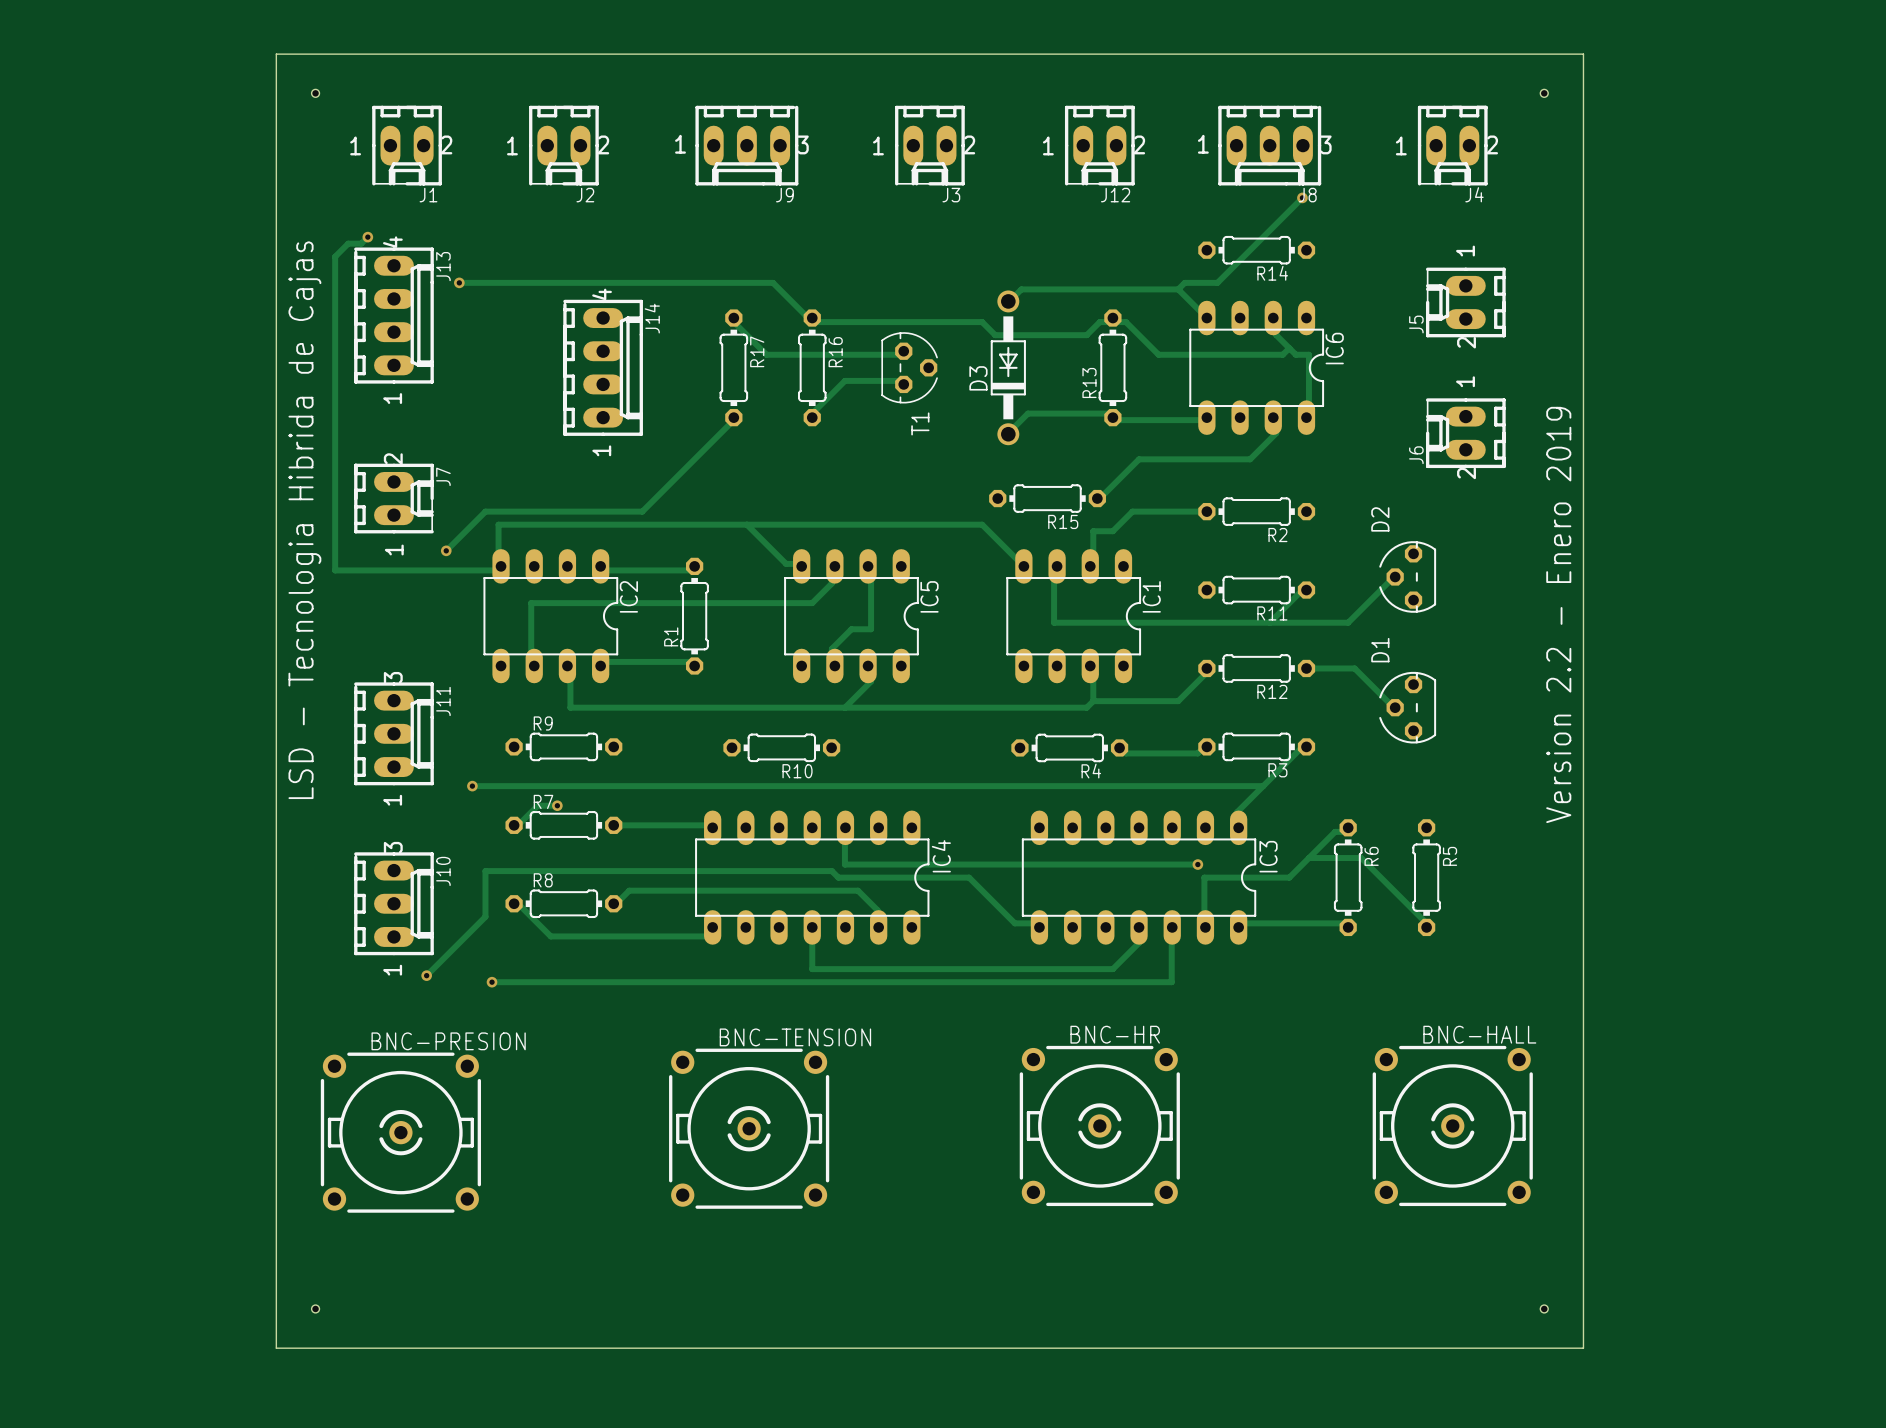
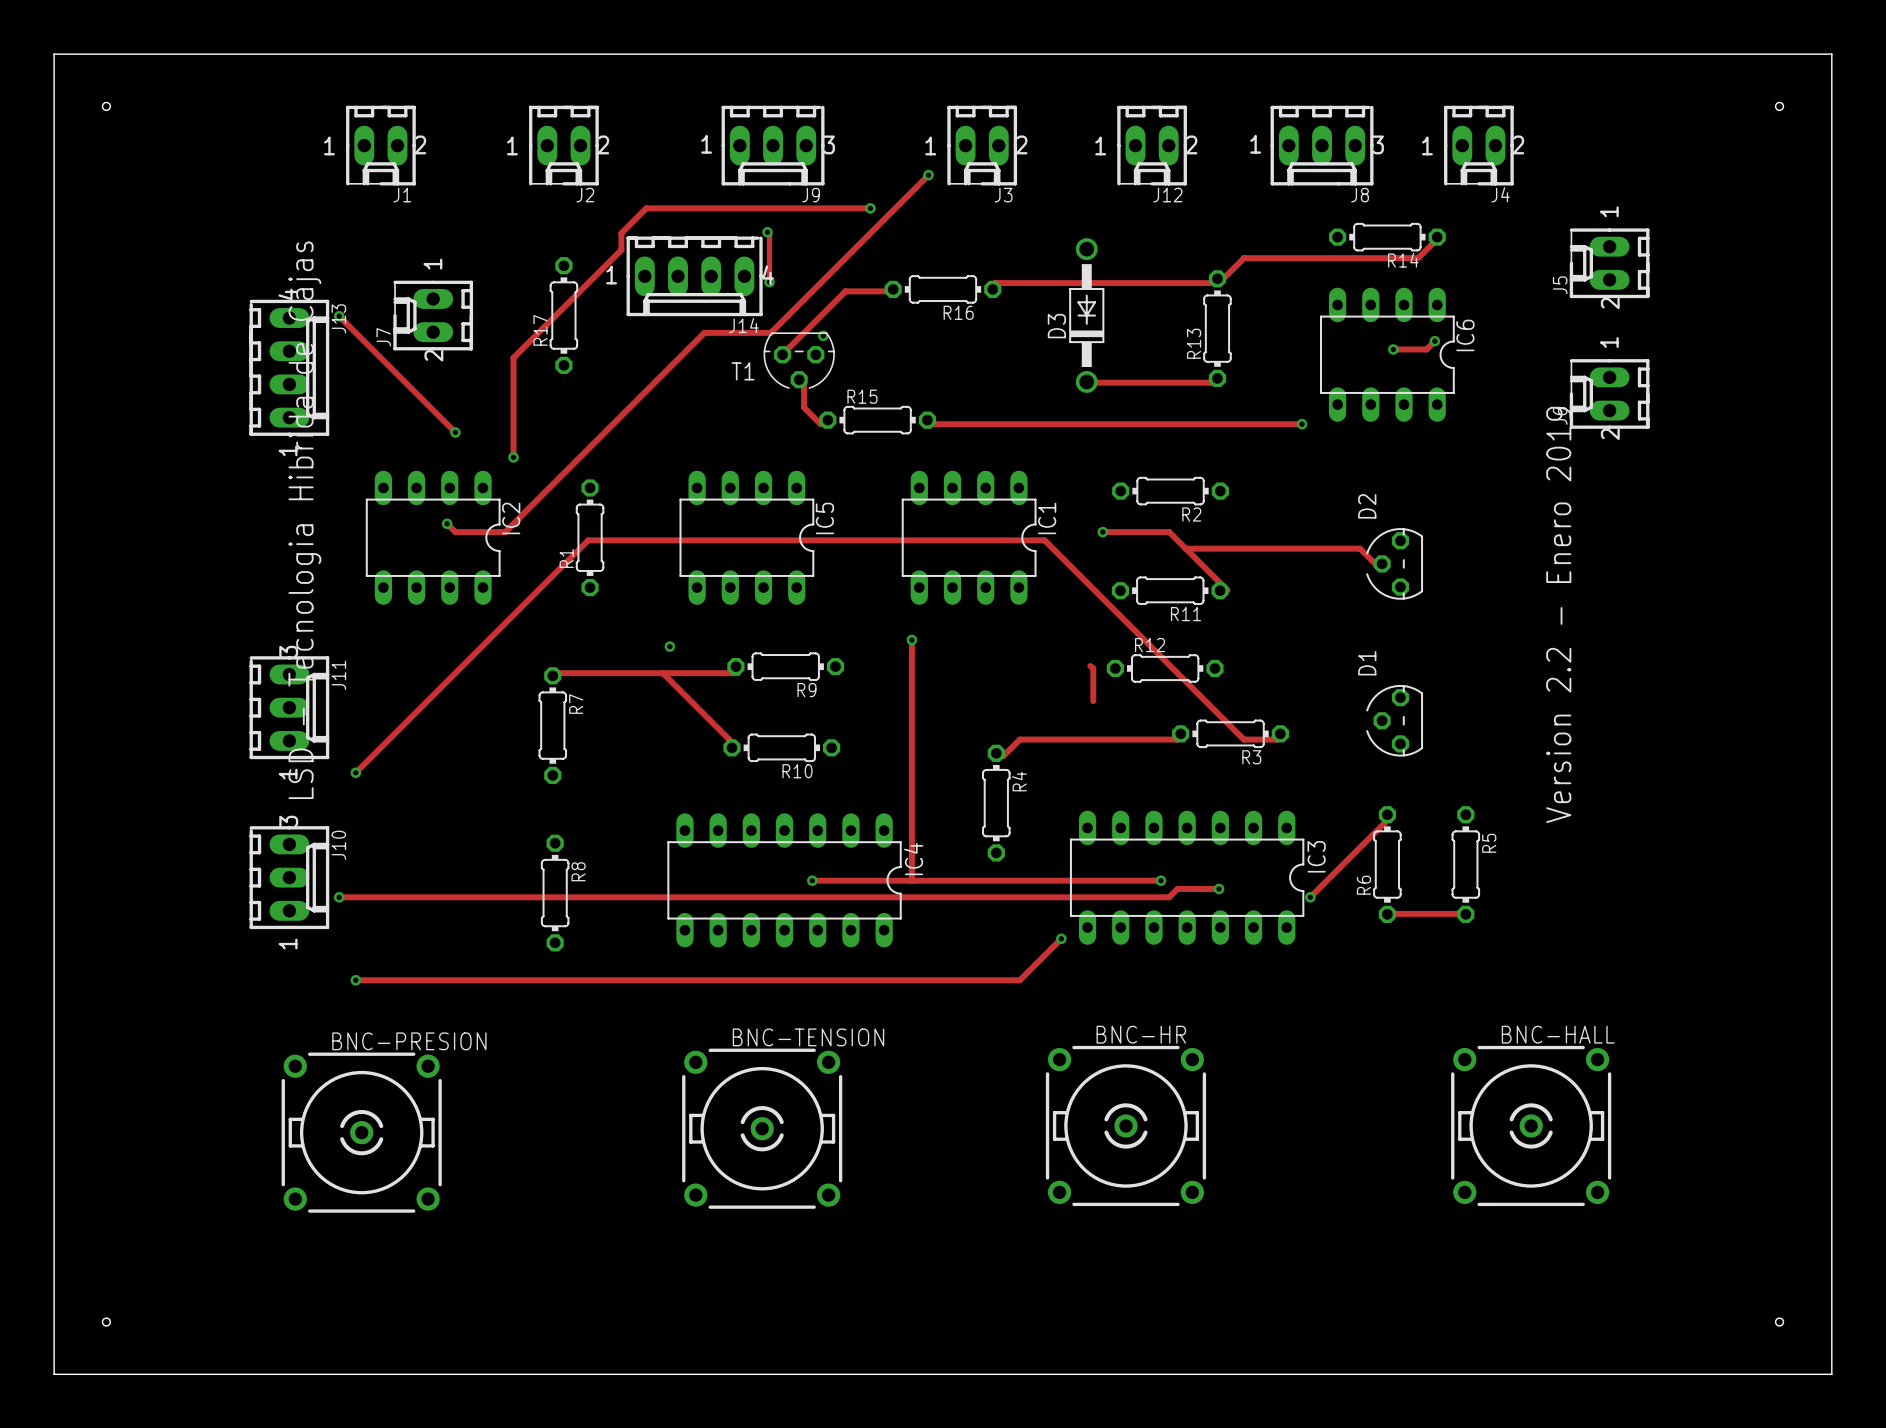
board edge: (276, 54) (276, 1348) (1583, 1348) (1583, 54) -> (276, 54) (54, 54) (54, 1374) (1831, 1374) (1831, 54) (1583, 54)
hole position: (315, 93) -> (106, 106)
hole position: (1544, 93) -> (1779, 106)
J1 position: (407, 145) -> (380, 145)
J9 position: (746, 145) -> (773, 145)
J3 position: (929, 145) -> (982, 145)
J12 position: (1099, 145) -> (1152, 145)
J8 position: (1269, 145) -> (1322, 145)
J4 position: (1452, 145) -> (1478, 145)
track: none -> (928, 175) (770, 332) (704, 332) (505, 532) (455, 532) (447, 523)
via: none -> (928, 175)
track: (1302, 197) (1217, 282) (1184, 282) (1178, 289) -> none
via: (1302, 197) -> none
track: none -> (870, 208) (646, 208) (621, 233) (621, 249) (513, 357) (513, 457)
via: none -> (870, 208)
track: none -> (767, 232) (769, 234) (769, 282)
via: none -> (767, 232)
track: (367, 237) (361, 243) (348, 243) (335, 256) (335, 570) (498, 570) (501, 566) (498, 563) (498, 524) (982, 524) (1023, 566) -> none
via: (367, 237) -> none
track: none -> (1437, 237) (1418, 258) (1243, 258) (1219, 283) (1217, 278) (1210, 283) (994, 283) (992, 289)
R14 position: (1256, 250) -> (1387, 237)
track: (459, 282) (773, 282) (805, 315) (812, 315) (812, 322) (982, 322) (995, 335) (1086, 335) (1099, 322) (1125, 322) (1158, 354) (1282, 354) (1289, 348) -> none
via: (459, 282) -> none
via: none -> (769, 282)
track: none -> (893, 289) (887, 291) (845, 291) (782, 354)
track: (1178, 289) (1206, 318) -> none
track: (1178, 289) (1021, 289) (1014, 295) (1008, 295) (1008, 301) -> none
J5 position: (1465, 302) -> (1609, 263)
J13 position: (393, 315) -> (289, 367)
track: none -> (339, 316) (455, 432)
via: none -> (339, 316)
track: (733, 318) (733, 322) (766, 354) (903, 354) (903, 351) -> none
track: (1273, 318) (1276, 322) (1276, 335) (1295, 354) (1308, 354) (1308, 413) (1306, 417) -> none
via: none -> (823, 335)
track: none -> (1434, 341) (1426, 349) (1393, 349)
via: none -> (1434, 341)
via: none -> (1393, 349)
R17 name position: R17 (757, 351) -> R17 (540, 330)
J14 rotation: 0° (603, 367) -> 90° clockwise (694, 276)
J14 position: (603, 367) -> (694, 276)
R17 position: (733, 367) -> (563, 315)
R16 rotation: 0° (812, 367) -> 90° clockwise (942, 289)
R16 position: (812, 367) -> (942, 289)
T1 rotation: 0° (909, 367) -> 90° clockwise (799, 360)
T1 position: (909, 367) -> (799, 360)
D3 position: (1008, 367) -> (1086, 315)
R13 position: (1112, 367) -> (1217, 328)
IC6 position: (1256, 367) -> (1387, 354)
track: none -> (1217, 378) (1210, 382) (1086, 381)
track: none -> (799, 379) (804, 382) (804, 407) (820, 424) (827, 420)
track: (903, 384) (903, 380) (844, 380) (812, 413) (812, 417) -> none
track: (733, 417) (733, 420) (642, 511) (485, 511) (446, 550) -> none
track: (1206, 417) (1204, 420) (1112, 420) (1112, 413) (1027, 413) (1008, 434) -> none
track: (1273, 417) (1276, 420) (1276, 433) (1250, 459) (1139, 459) (1099, 498) (1097, 498) -> none
track: none -> (927, 420) (928, 424) (1302, 424)
via: none -> (1302, 424)
via: none -> (455, 432)
J6 position: (1465, 433) -> (1609, 393)
via: none -> (513, 457)
J7 footprint: [354, 463, 434, 534] -> [393, 280, 474, 351]
J7 name position: J7 (443, 476) -> J7 (383, 337)
R15 position: (1047, 498) -> (877, 420)
track: (1206, 511) (1132, 511) (1112, 531) (1093, 531) (1093, 563) (1090, 566) -> none
R2 position: (1256, 511) -> (1170, 491)
R15 name position: R15 (1063, 521) -> R15 (862, 396)
track: (746, 524) (786, 563) (799, 563) (801, 566) -> none
track: none -> (1102, 532) (1169, 532) (1227, 590) (1220, 590)
via: none -> (1102, 532)
track: none -> (1185, 548) (1360, 548) (1376, 565) (1382, 563)
via position: (446, 550) -> (447, 523)
track: (600, 566) (603, 570) (694, 570) (694, 566) -> none
track: (834, 566) (831, 570) (831, 583) (812, 603) (531, 603) (531, 661) (534, 665) -> none
track: (868, 566) (871, 570) (871, 629) (851, 629) (831, 648) (831, 661) (834, 665) -> none
track: (1057, 566) (1054, 570) (1054, 622) (1348, 622) (1395, 576) -> none
D2 position: (1407, 576) -> (1394, 563)
R11 position: (1256, 590) -> (1170, 590)
track: (1306, 590) (1302, 590) (1269, 622) -> none
IC2 position: (550, 616) -> (433, 537)
R1 position: (694, 616) -> (590, 537)
IC5 position: (851, 616) -> (746, 537)
IC1 position: (1073, 616) -> (969, 537)
track: none -> (911, 639) (911, 880)
via: none -> (911, 639)
via: none -> (669, 646)
track: (567, 665) (570, 668) (570, 707) (1086, 707) (1093, 701) (1178, 701) (1210, 668) (1206, 668) -> none
track: (600, 665) (603, 661) (694, 661) (694, 665) -> none
track: (868, 665) (871, 668) (871, 681) (844, 707) -> none
track: none -> (735, 666) (737, 673) (555, 673) (552, 675)
R12 position: (1256, 668) -> (1165, 668)
track: (1306, 668) (1354, 668) (1395, 707) -> none
track: none -> (662, 673) (729, 739) (732, 747)
R12 name position: R12 (1272, 691) -> R12 (1150, 645)
D1 position: (1407, 707) -> (1394, 720)
R9 name position: R9 (543, 723) -> R9 (806, 690)
J11 position: (393, 733) -> (289, 707)
track: none -> (1180, 733) (1177, 739) (1019, 739) (1003, 756) (996, 753)
track: none -> (1280, 733) (1277, 739) (1243, 739) (1044, 540) (588, 540) (355, 772)
R9 position: (563, 746) -> (785, 666)
track: (1206, 746) (1197, 753) (1125, 753) (1119, 747) -> none
R3 position: (1256, 746) -> (1230, 733)
track: (1306, 746) (1302, 746) (1237, 812) (1238, 827) -> none
R4 rotation: 0° (1069, 747) -> 90° clockwise (996, 803)
R4 position: (1069, 747) -> (996, 803)
R4 name position: R4 (1091, 771) -> R4 (1019, 781)
via: none -> (355, 772)
track: (472, 786) (1263, 786) -> none
via: (472, 786) -> none
track: (557, 805) (537, 805) (518, 825) (514, 825) -> none
via: (557, 805) -> none
track: none -> (1387, 814) (1385, 822) (1310, 897)
R7 rotation: 0° (563, 825) -> 90° clockwise (552, 725)
R7 position: (563, 825) -> (552, 725)
track: (613, 825) (707, 825) (712, 827) -> none
track: (845, 827) (844, 864) (1197, 864) -> none
track: (1348, 827) (1348, 831) (1335, 831) (1289, 877) (1204, 877) (1205, 927) -> none
R6 name position: R6 (1371, 856) -> R6 (1363, 885)
track: (1308, 858) (1361, 858) (1426, 923) (1426, 927) -> none
via: (1197, 864) -> none
IC4 position: (812, 877) -> (784, 880)
IC3 position: (1139, 877) -> (1187, 877)
R6 position: (1348, 877) -> (1387, 864)
R5 position: (1426, 877) -> (1465, 864)
track: none -> (812, 880) (1160, 880)
via: none -> (812, 880)
via: none -> (1160, 880)
track: none -> (1219, 888) (1177, 888) (1169, 897) (339, 897)
via: none -> (1219, 888)
via: none -> (339, 897)
via: none -> (1310, 897)
J10 position: (393, 903) -> (289, 877)
track: (514, 903) (518, 903) (550, 936) (707, 936) (714, 929) (712, 927) -> none
R8 rotation: 0° (563, 903) -> 90° clockwise (555, 893)
track: (613, 903) (616, 903) (629, 890) (858, 890) (877, 910) (878, 927) -> none
track: none -> (1387, 914) (1465, 914)
track: (812, 927) (812, 969) (1112, 969) (1139, 942) (1139, 927) -> none
track: (1039, 927) (1034, 923) (1014, 923) (969, 877) (838, 877) (831, 871) (485, 871) (485, 916) (426, 975) -> none
track: (1172, 927) (1171, 982) (492, 982) -> none
track: (1238, 927) (1243, 923) (1348, 923) (1348, 927) -> none
track: none -> (1061, 938) (1019, 980) (355, 980)
via: none -> (1061, 938)
via: (426, 975) -> none
via: none -> (355, 980)
via: (492, 982) -> none
BNC-HR position: (1099, 1125) -> (1125, 1125)
BNC-HALL position: (1452, 1125) -> (1531, 1125)
BNC-TENSION position: (749, 1128) -> (762, 1128)
BNC-PRESION position: (400, 1132) -> (361, 1132)
hole position: (315, 1308) -> (106, 1322)
hole position: (1544, 1308) -> (1779, 1322)

